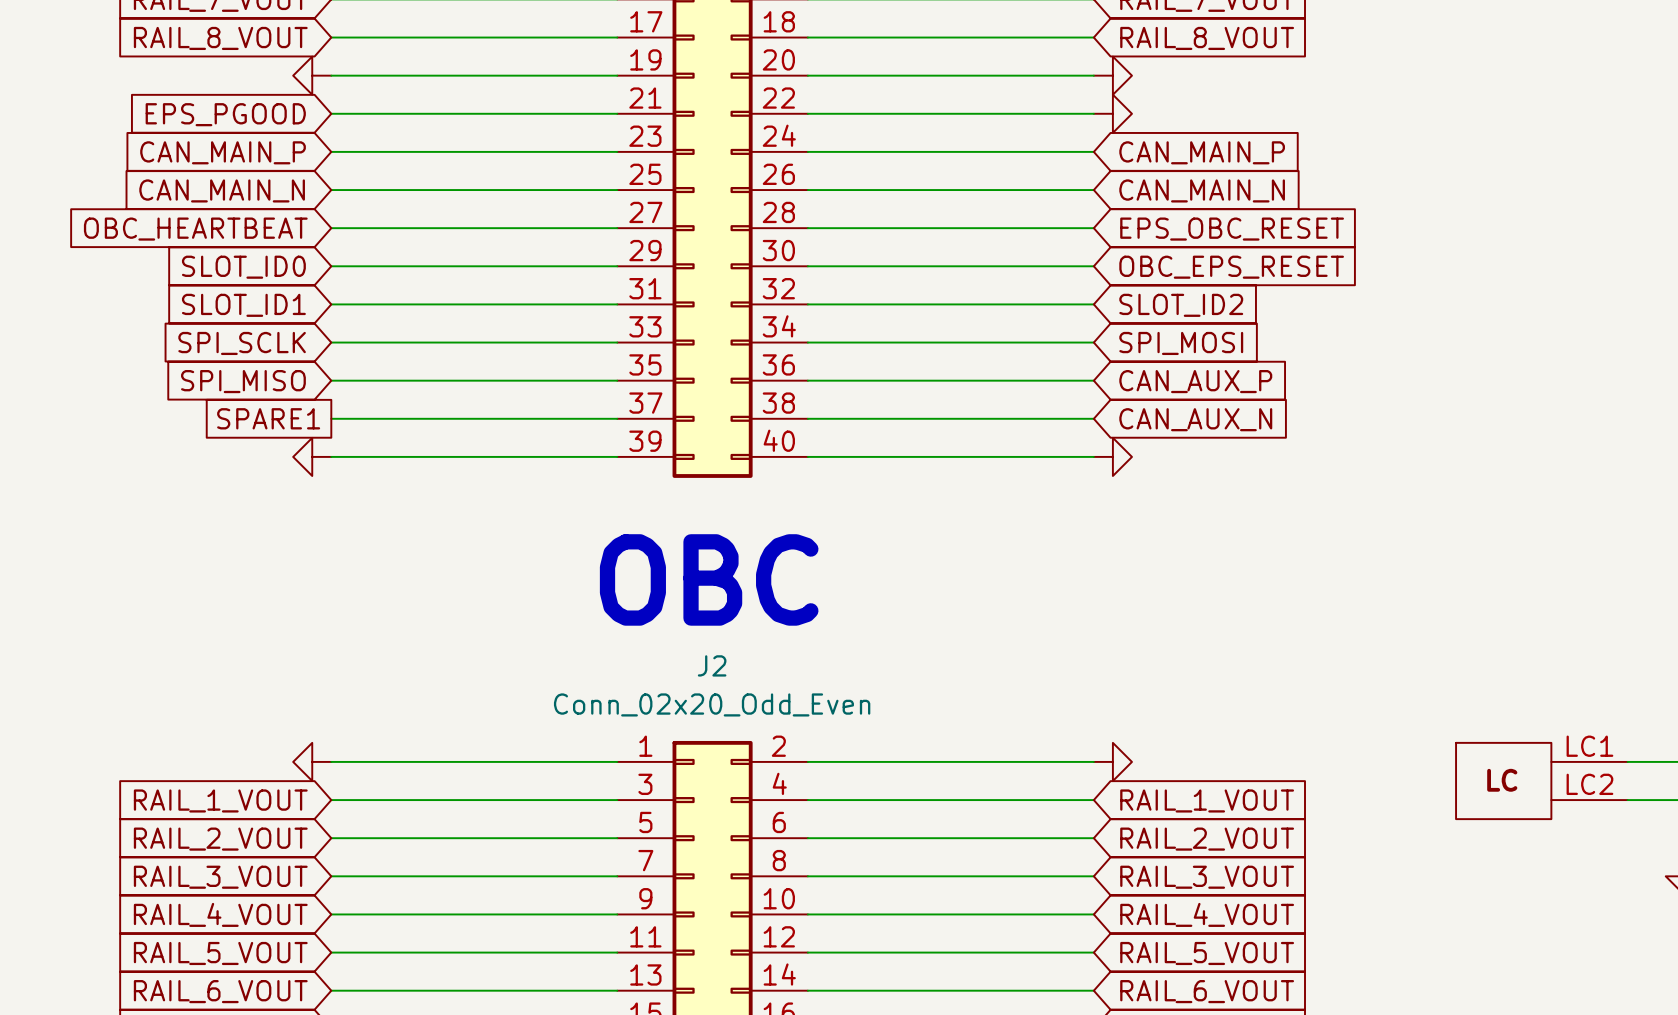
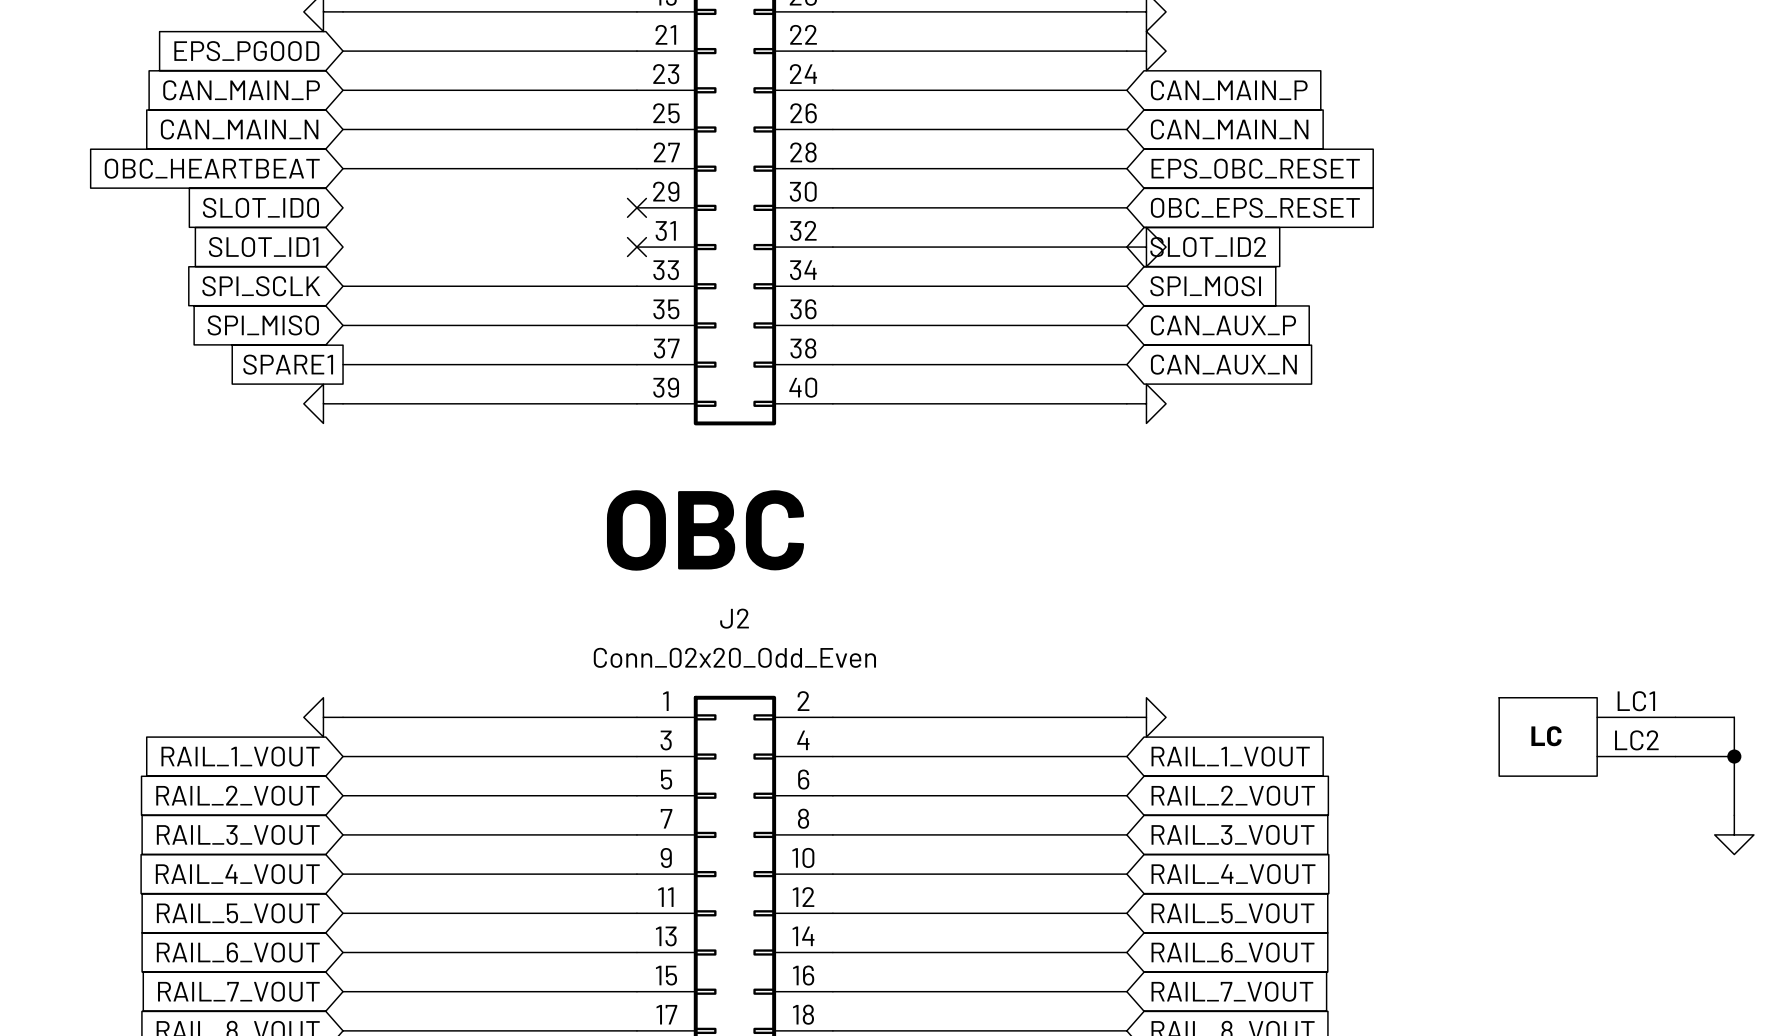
wire: (331, 266) (617, 266) -> none
no-connect mark: none -> (636, 207)
wire: (331, 304) (617, 304) -> none
no-connect mark: none -> (636, 247)
power symbol: none -> (1146, 247)

